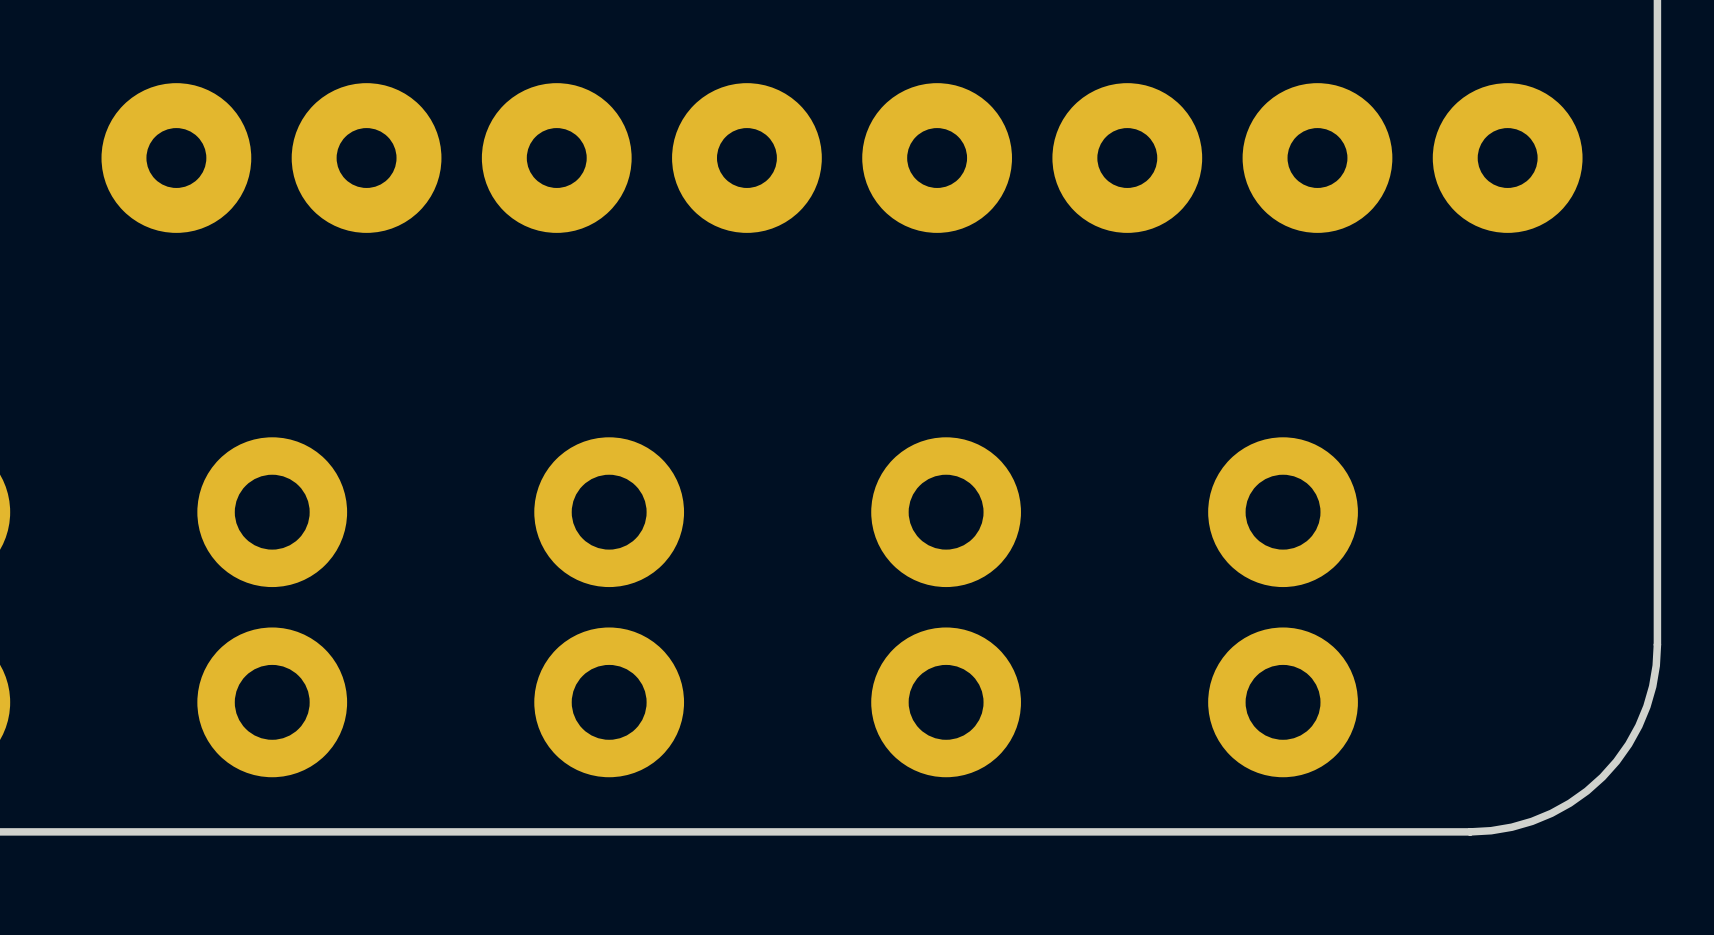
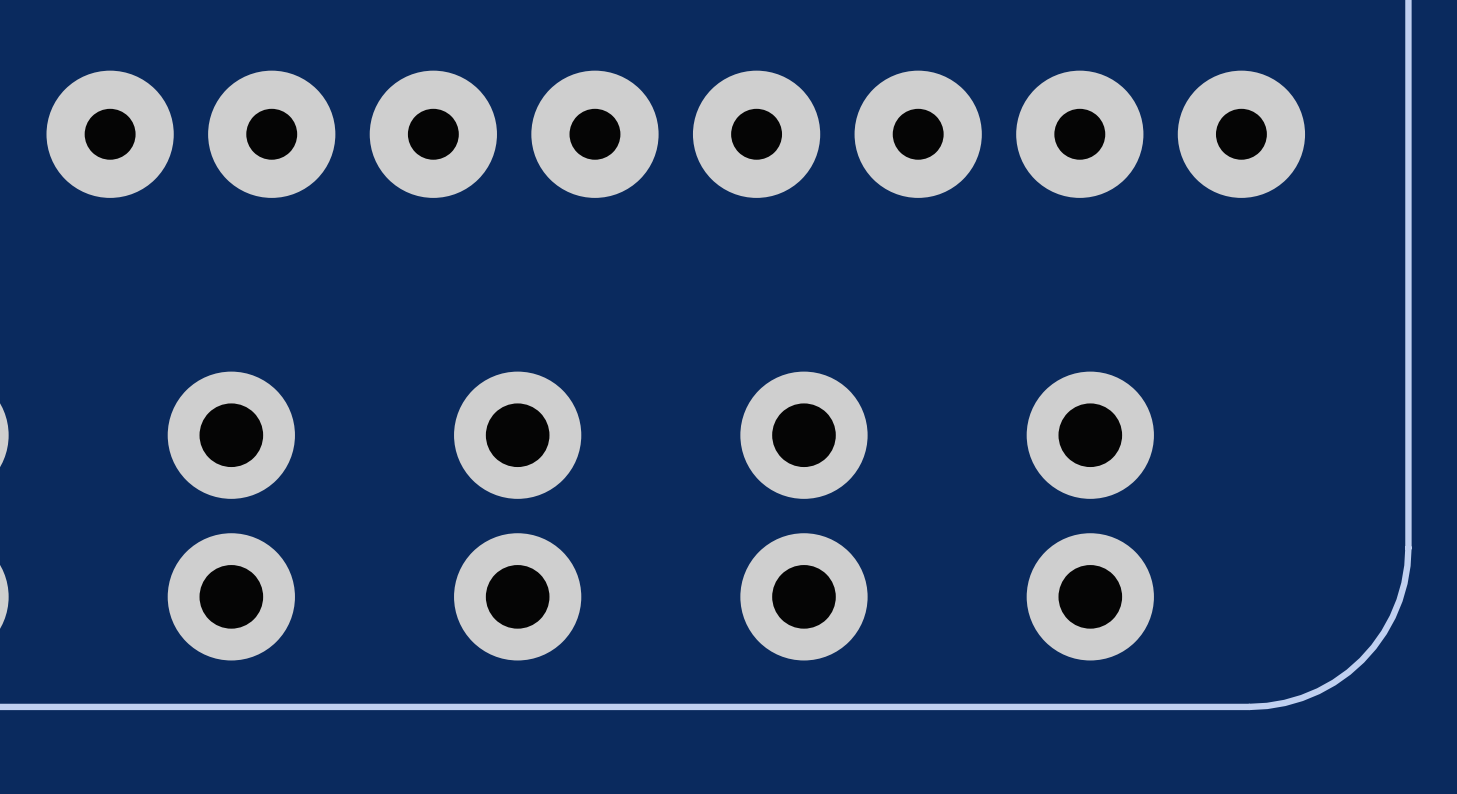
part position: (842, 158) -> (675, 134)

